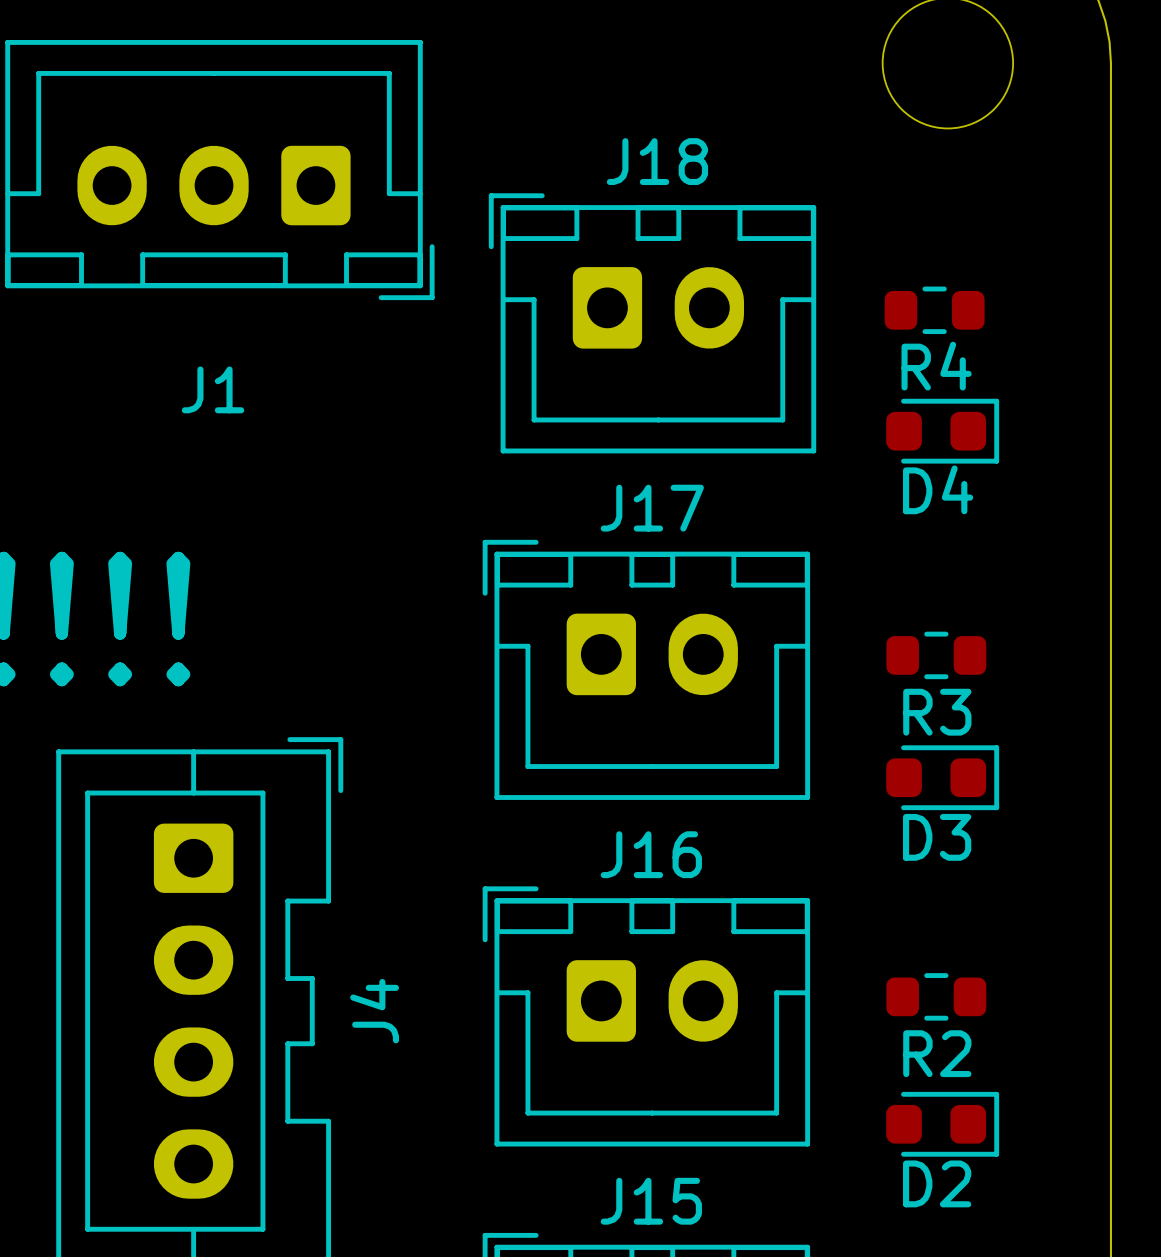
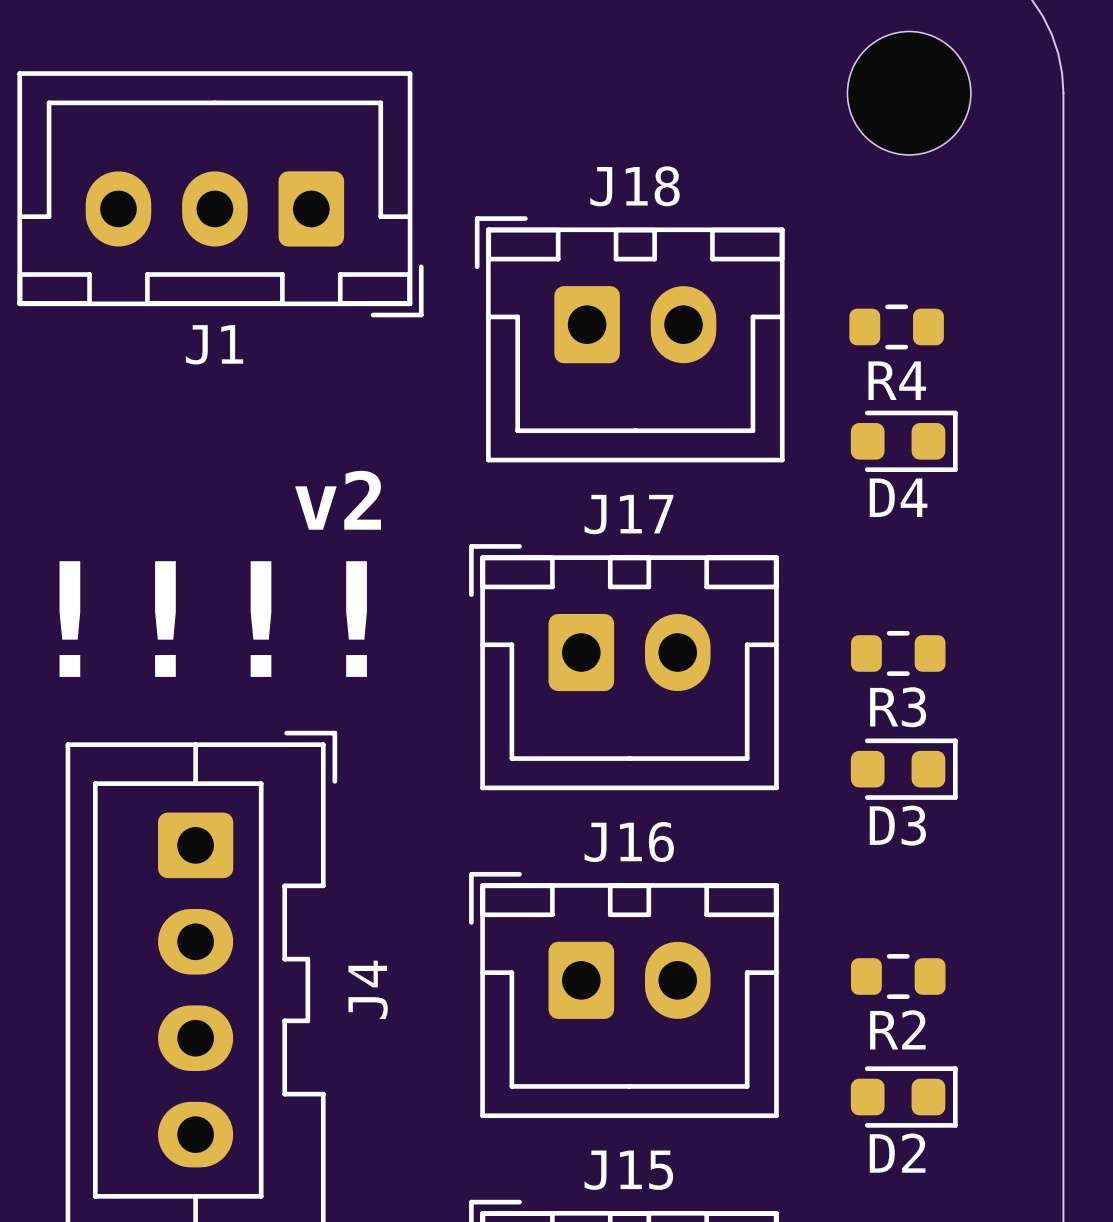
J1 name position: J1 (213, 389) -> J1 (214, 344)
text: none -> v2 (338, 500)

